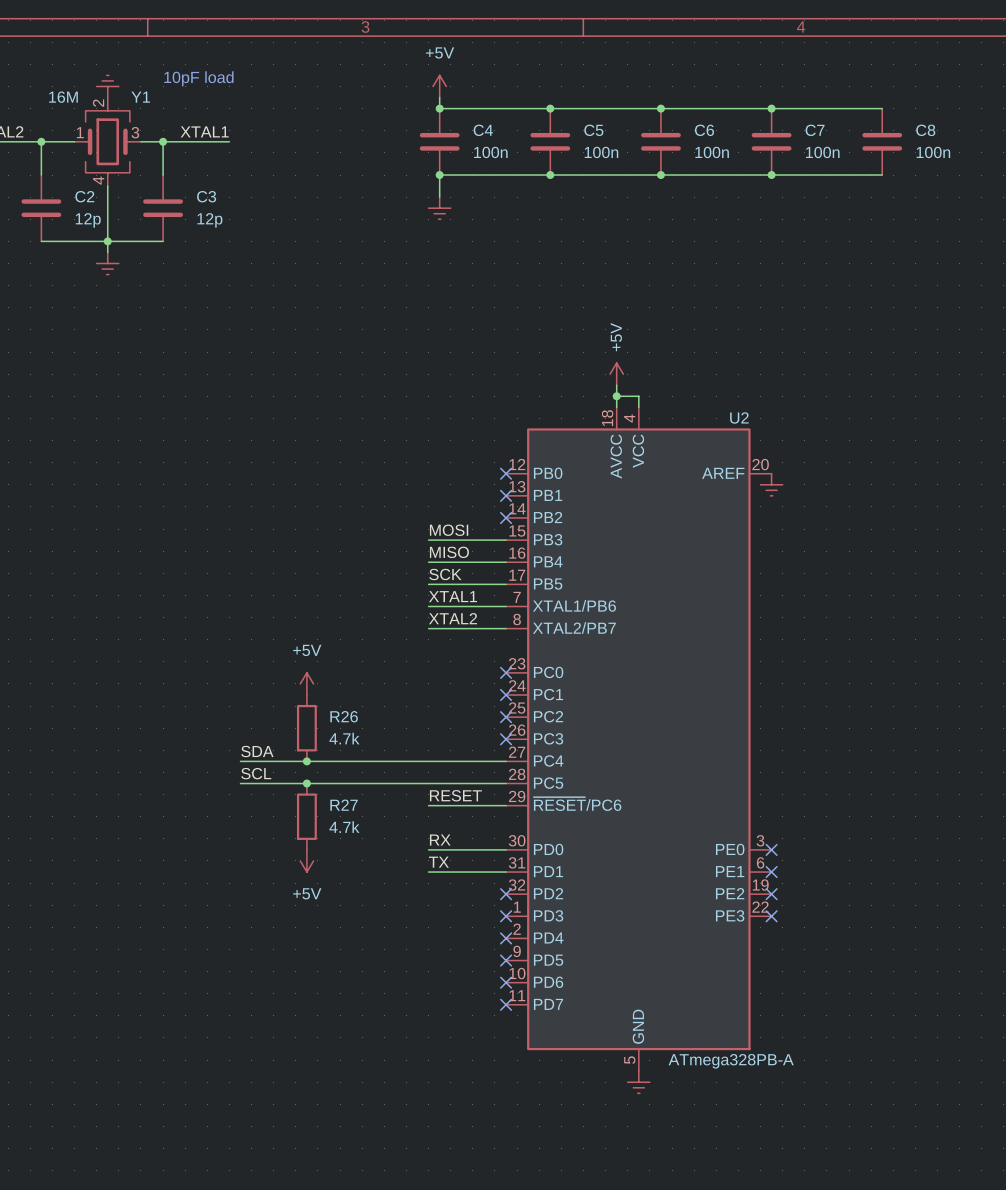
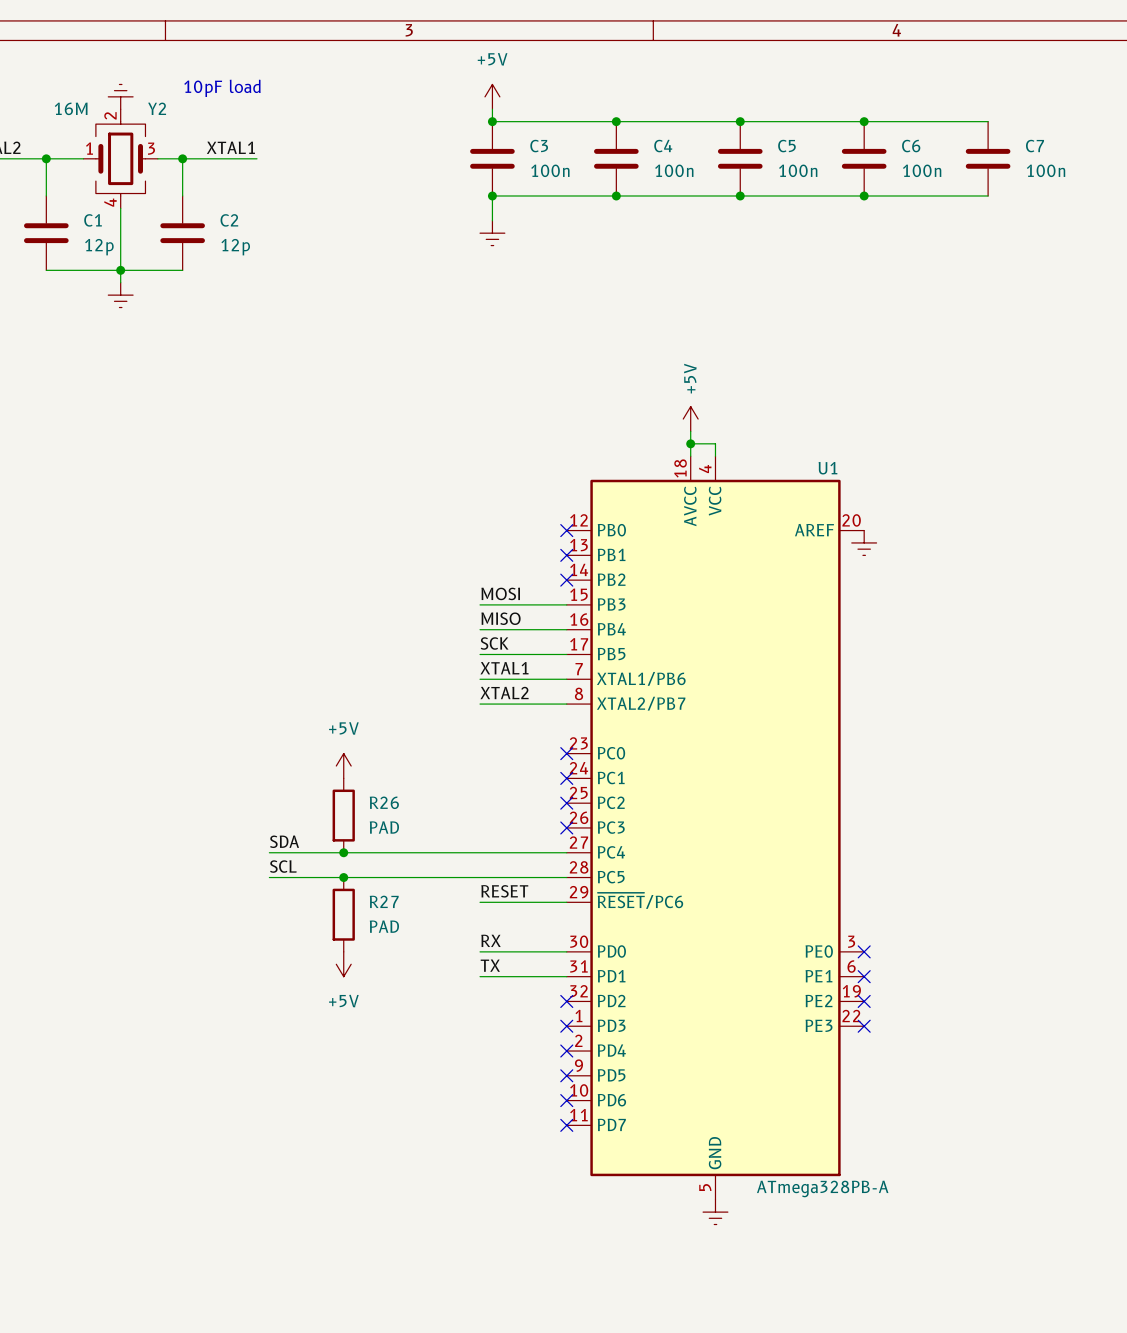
Y1 name: Y1 (140, 97) -> Y2 (157, 108)
C4 name: C4 (483, 130) -> C3 (539, 146)
C5 name: C5 (593, 130) -> C4 (663, 146)
C6 name: C6 (704, 130) -> C5 (786, 146)
C7 name: C7 (815, 130) -> C6 (911, 146)
C8 name: C8 (925, 130) -> C7 (1035, 146)
C2 name: C2 (84, 196) -> C1 (93, 220)
C3 name: C3 (206, 196) -> C2 (229, 220)
U2 name: U2 (739, 417) -> U1 (827, 468)
R26 value: 4.7k (344, 738) -> PAD (384, 827)
R27 value: 4.7k (344, 827) -> PAD (384, 926)

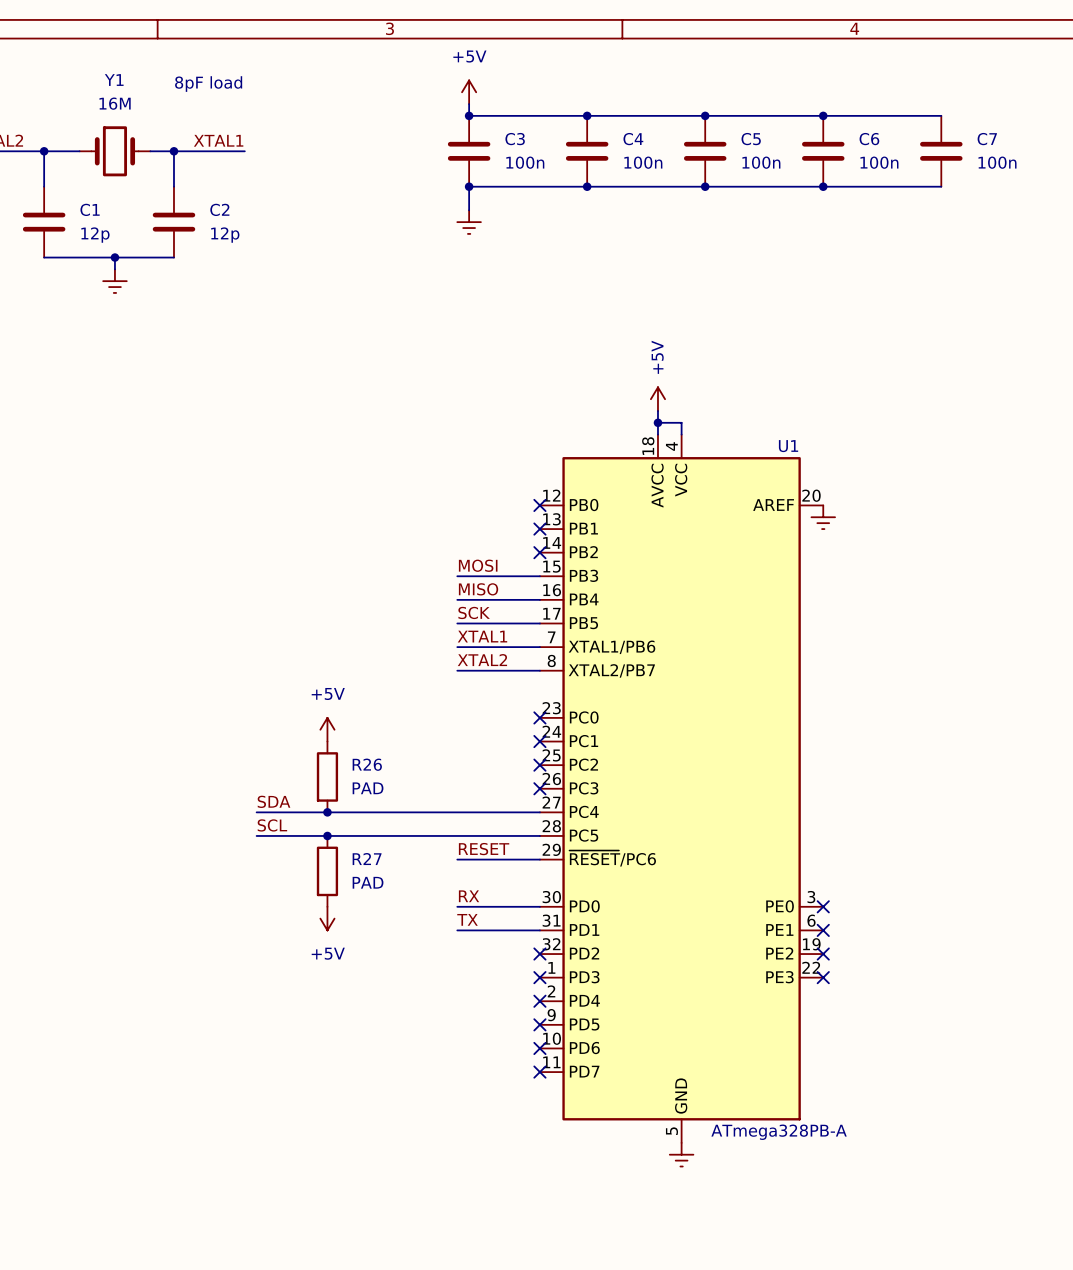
text: 10pF load (222, 88) -> 8pF load (208, 84)
power symbol: (120, 96) -> none
Y2: 16M (120, 158) -> none
Y1: none -> 16M (114, 151)
wire: (120, 208) (120, 270) -> none

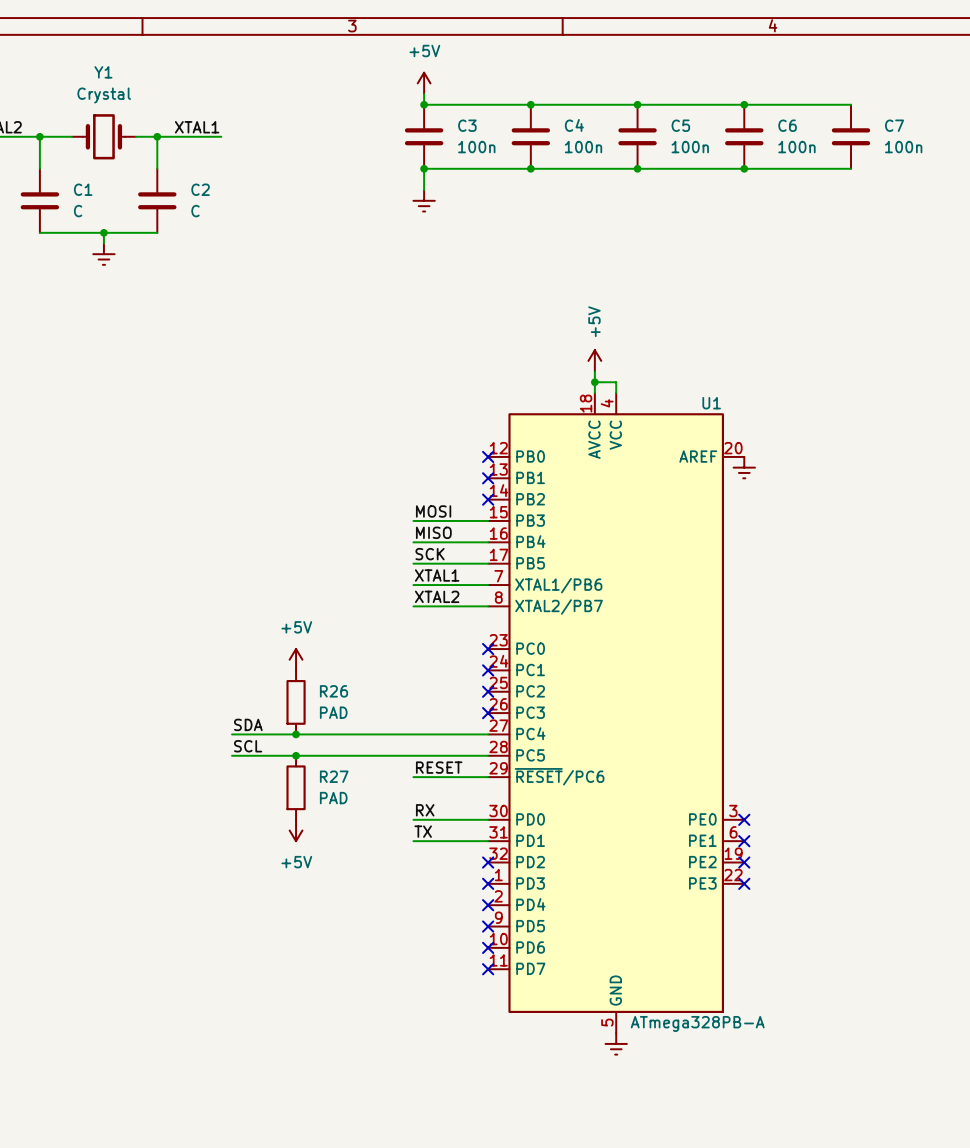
text: 8pF load (208, 84) -> none
Y1 value: 16M (115, 103) -> Crystal (104, 95)
C1 value: 12p (95, 235) -> C (78, 211)
C2 value: 12p (225, 235) -> C (195, 211)

